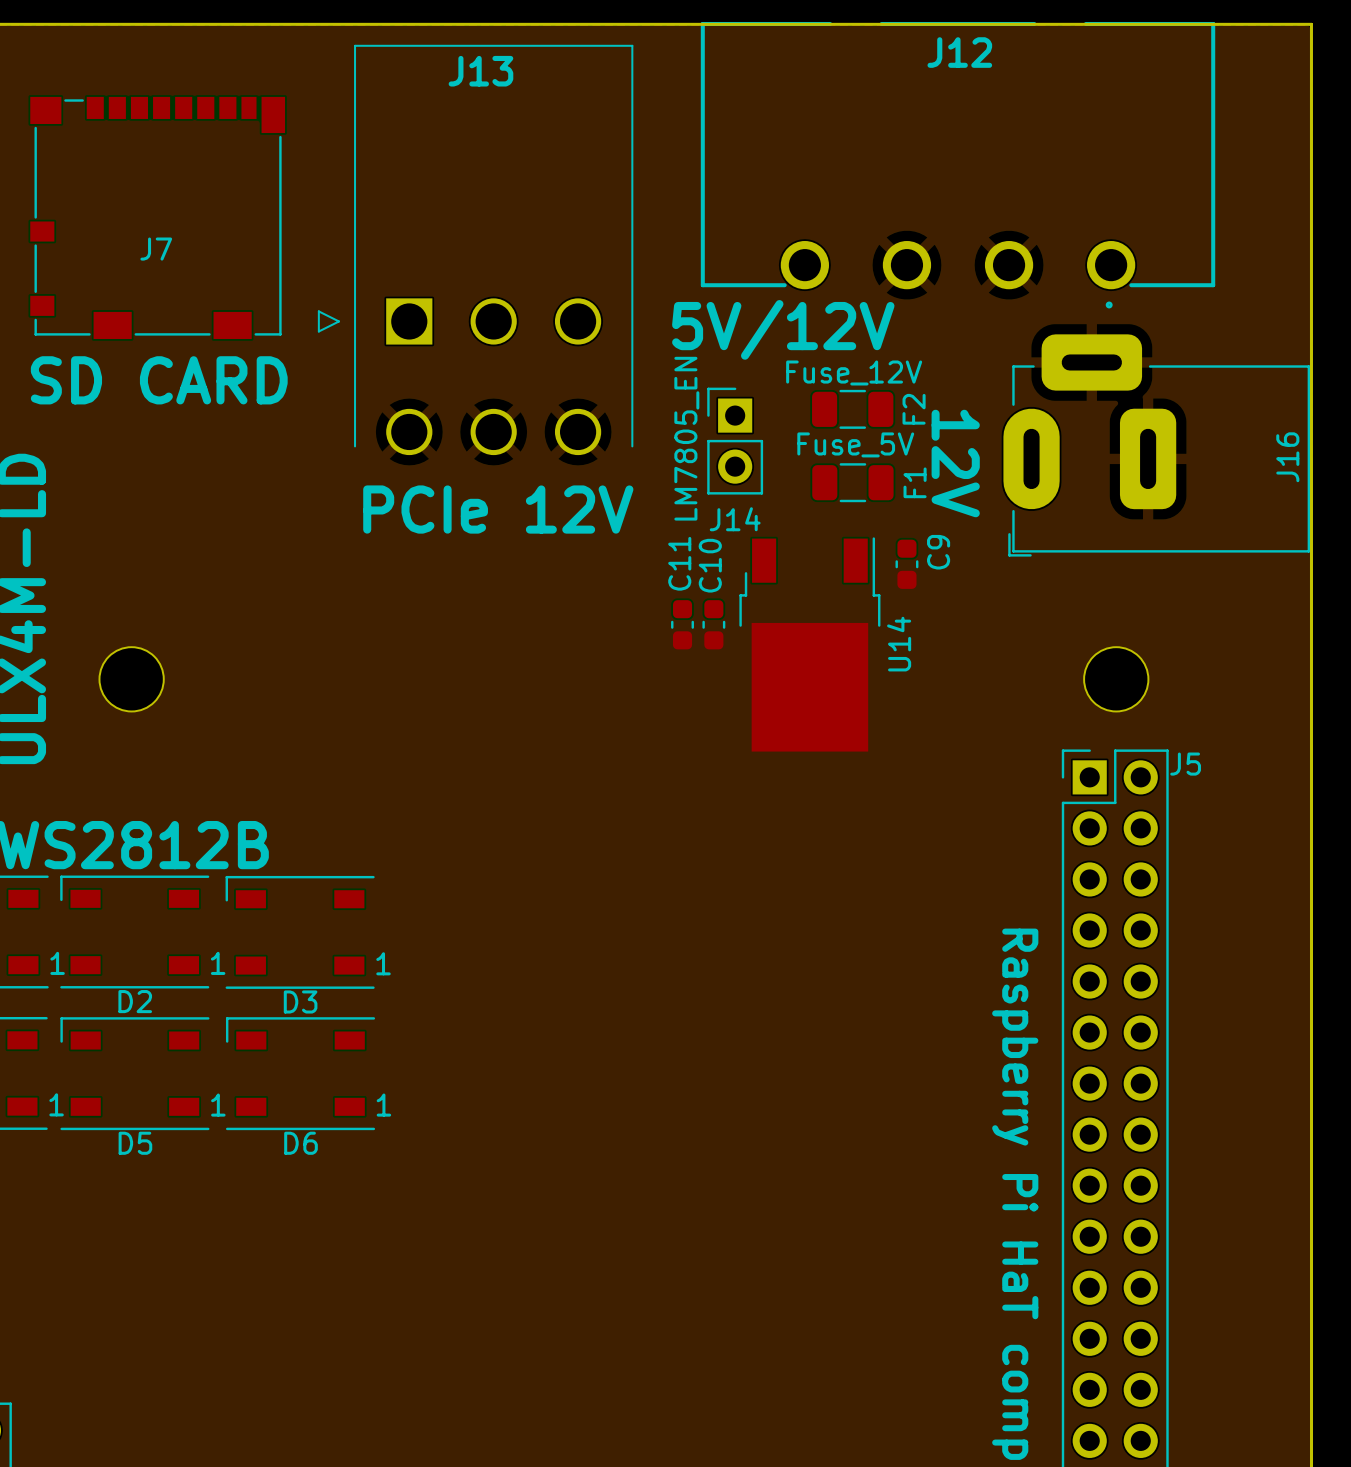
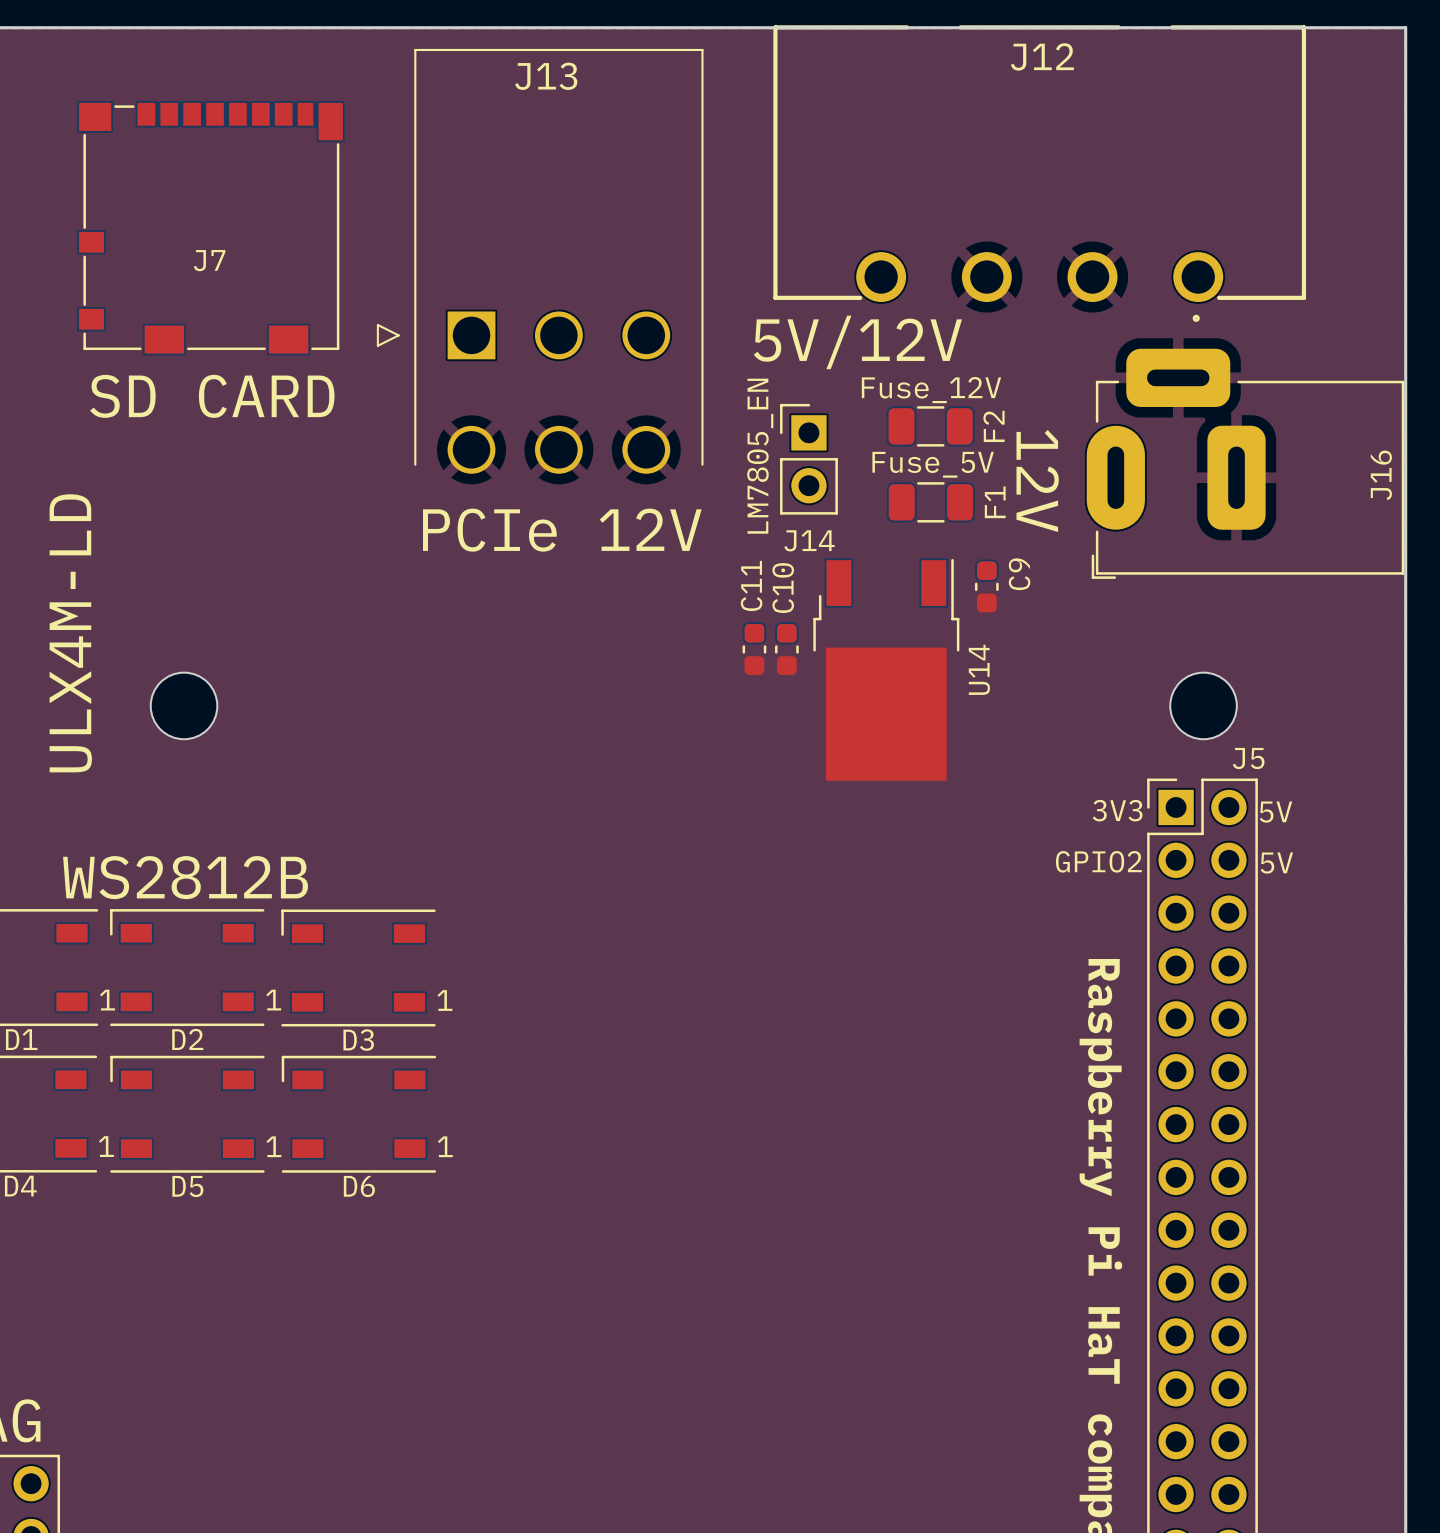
J5 name position: J5 (1185, 764) -> J5 (1248, 758)
text: none -> 3V3 (1117, 810)
text: none -> 5V (1275, 812)
text: none -> GPIO2 (1098, 861)
text: none -> 5V (1276, 863)

